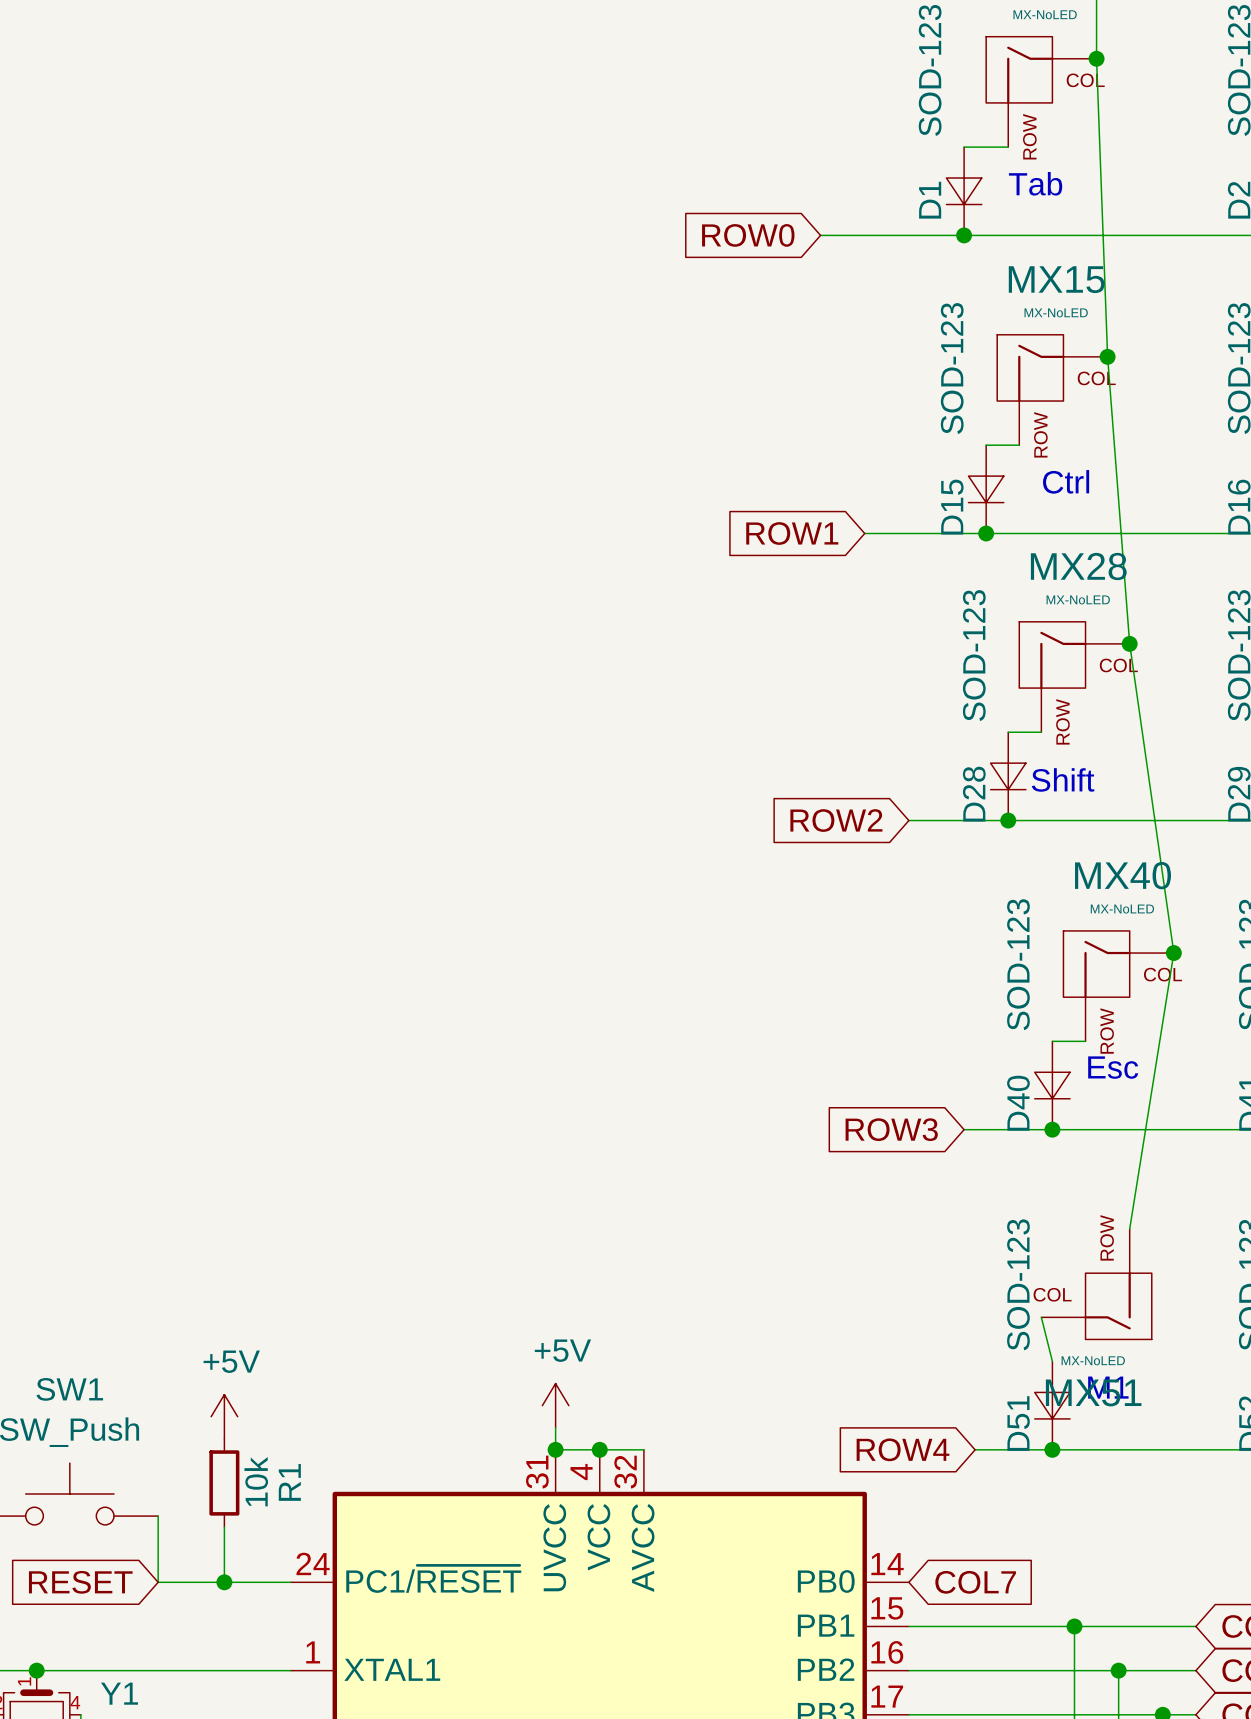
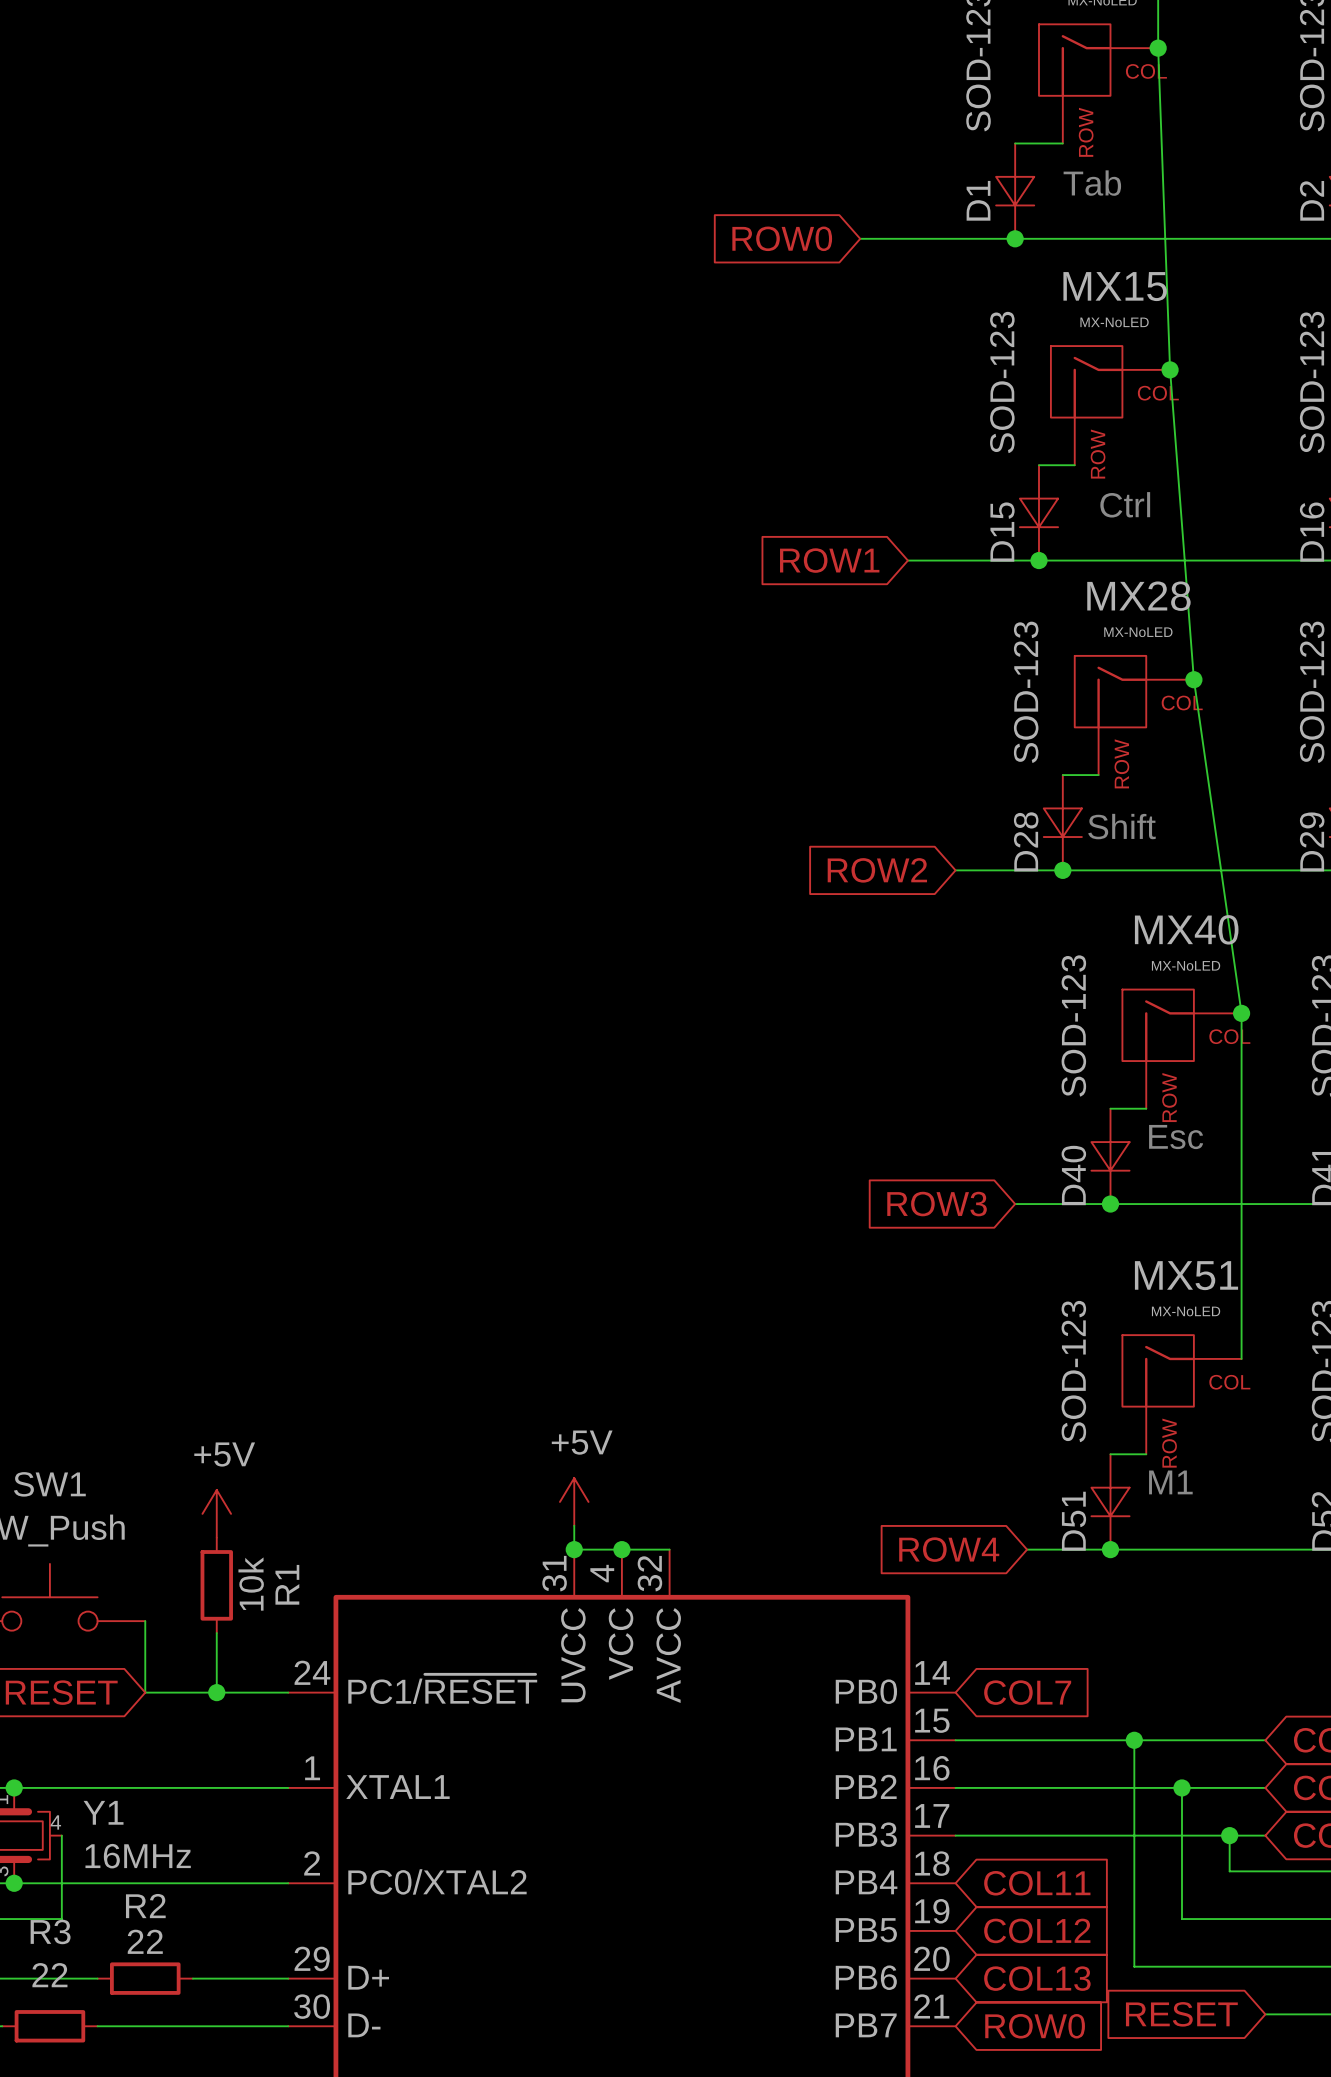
wire: (1173, 953) (1129, 1229) -> (1241, 1013) (1241, 1358)
MX51 rotation: 0° (1118, 1305) -> 180° (1158, 1371)
wire: (1041, 1317) (1052, 1361) -> (1146, 1454) (1110, 1454)

